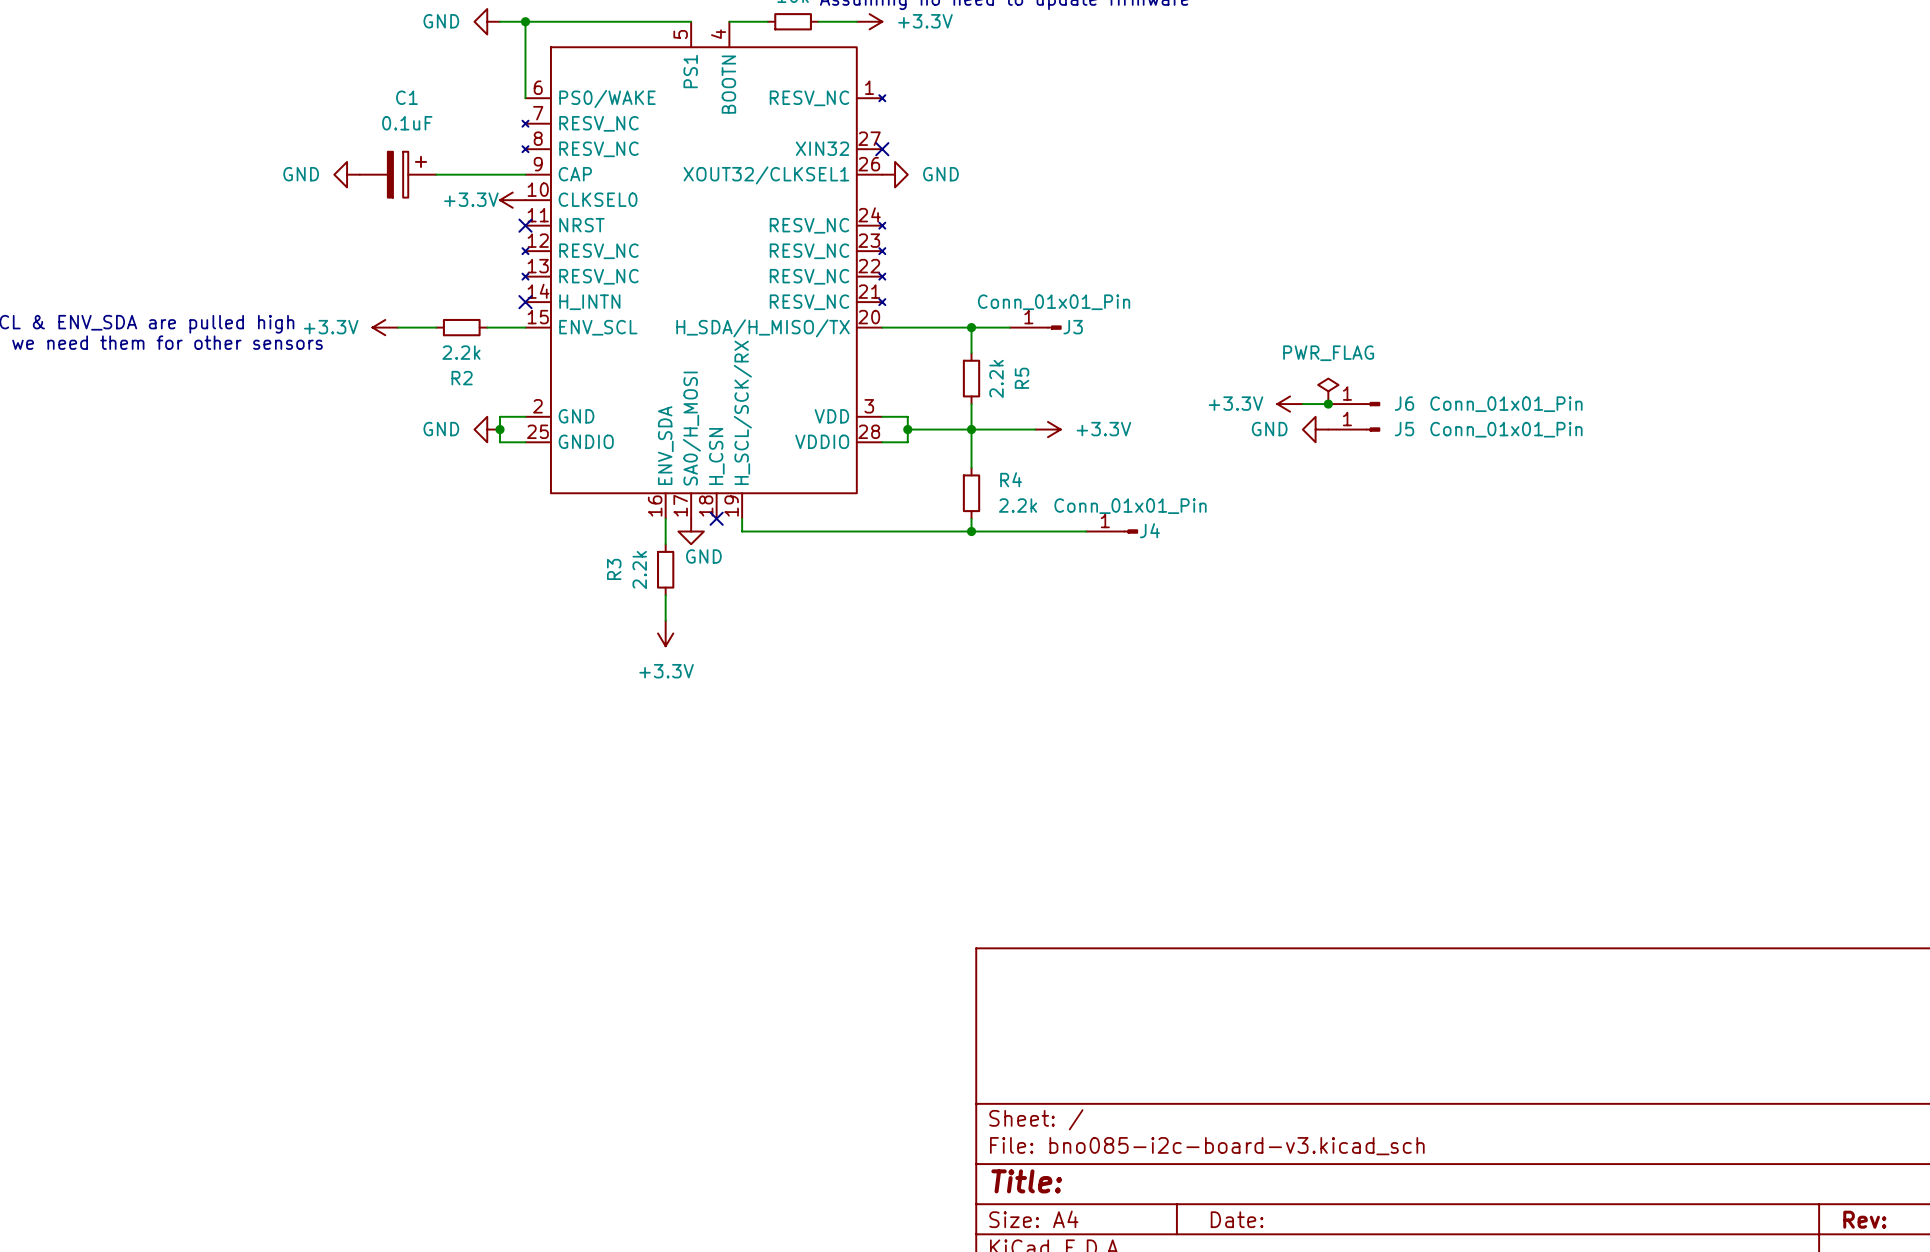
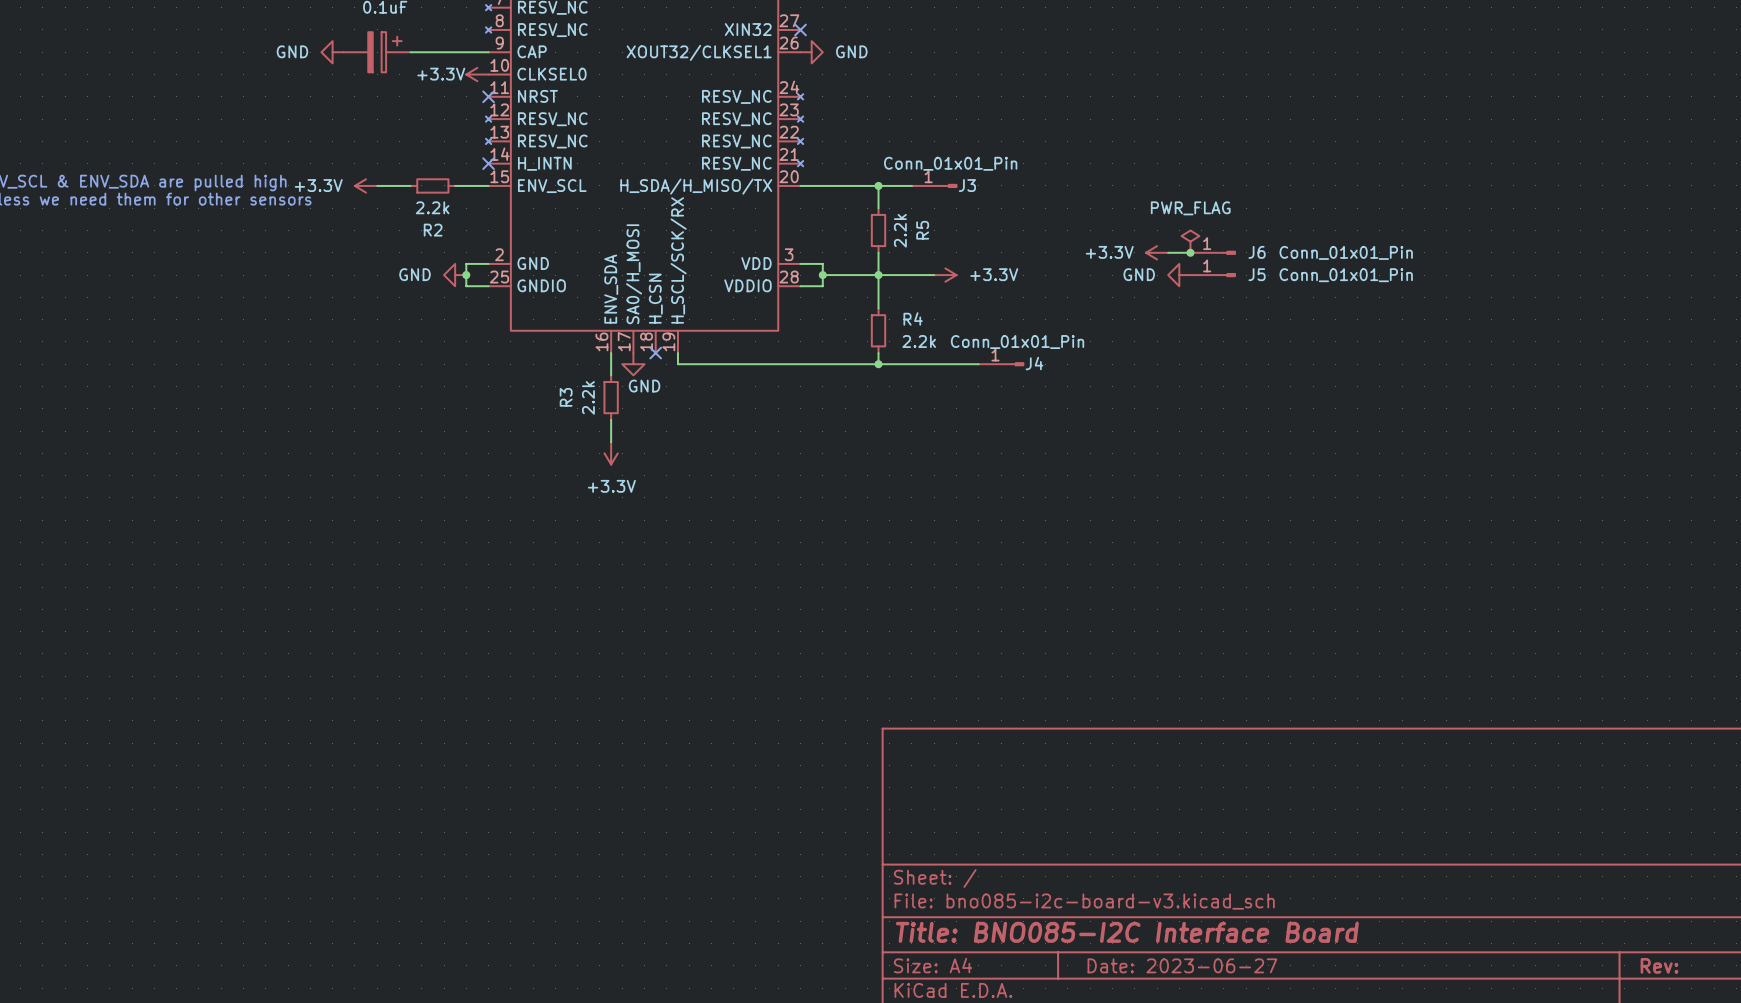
title block: Title: (1026, 1181) -> Title: BNO085-I2C Interface Board (1127, 932)
title block: Date: (1237, 1219) -> Date: 2023-06-27 (1182, 965)

